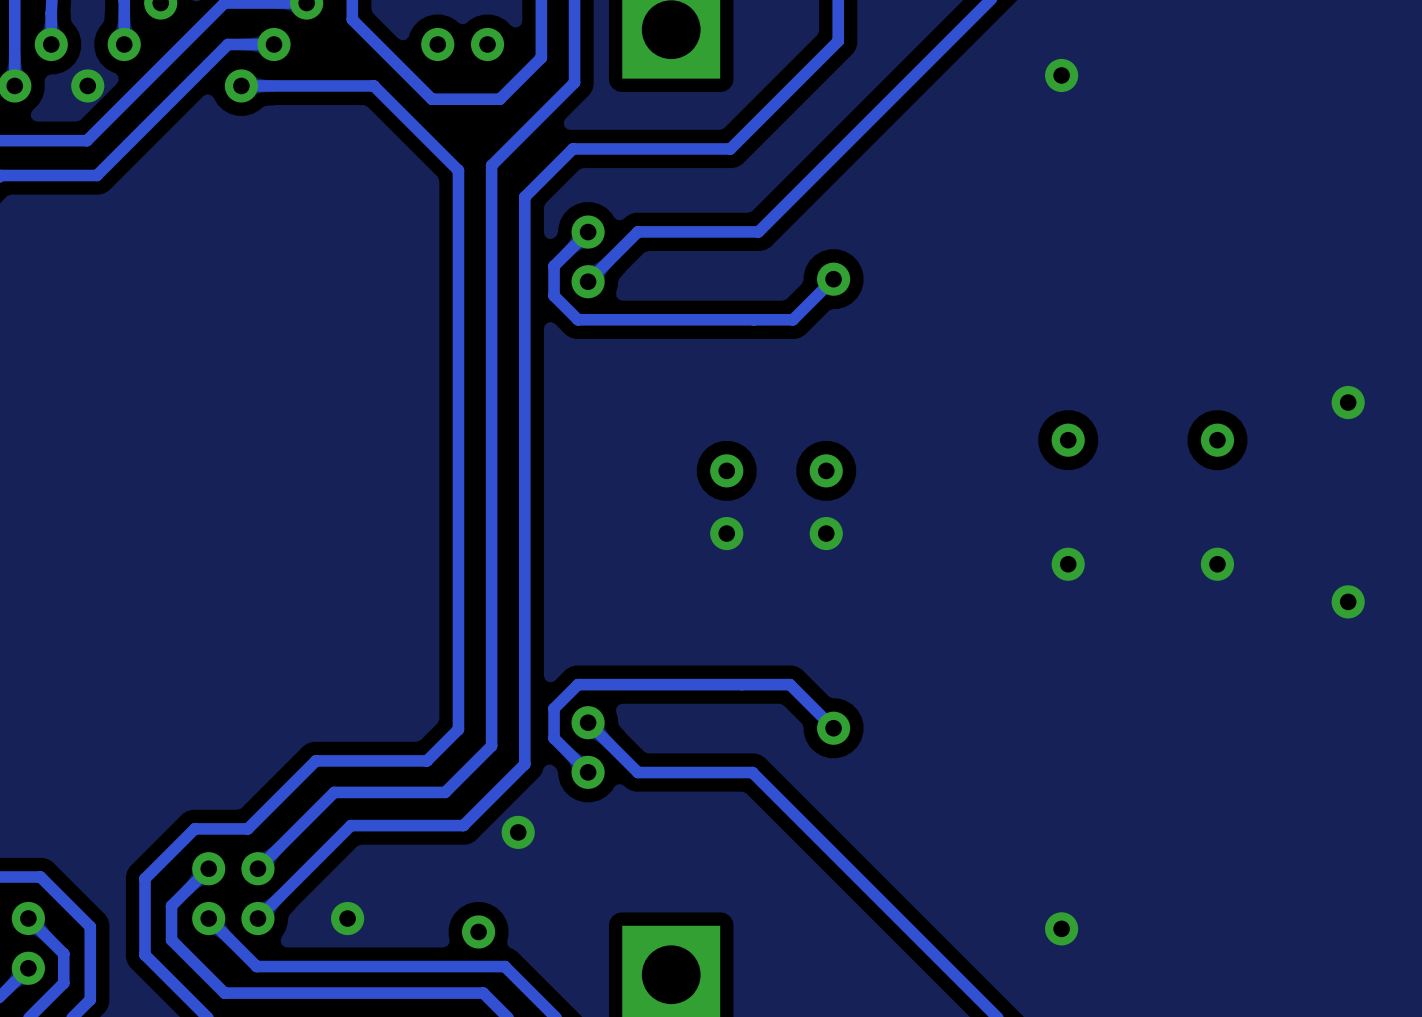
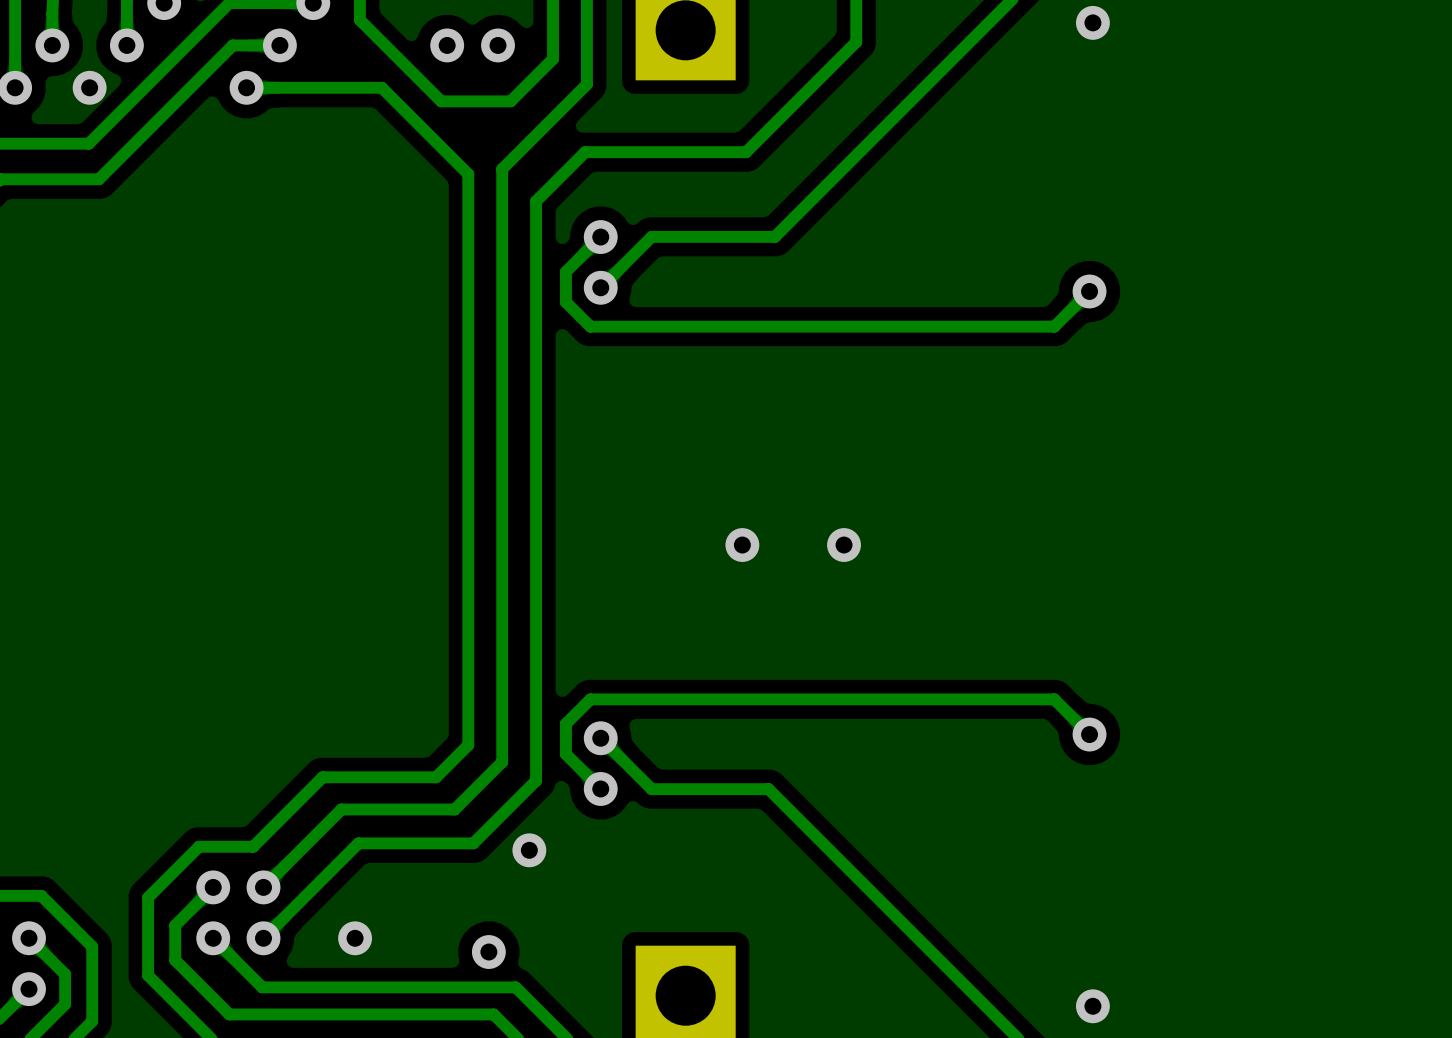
via: none -> (1092, 22)
via: (1061, 75) -> none
track: (833, 279) (792, 319) -> (1089, 291) (1054, 326) (810, 326)
via: (833, 279) -> none
via: none -> (1089, 291)
via: (1348, 402) -> none
via: (1068, 440) -> none
via: (1217, 440) -> none
via: (726, 470) -> none
via: (826, 470) -> none
via: (1068, 564) -> none
via: (1217, 564) -> none
via: (1348, 601) -> none
track: (789, 684) (833, 728) -> (806, 699) (1054, 699) (1089, 734)
via: none -> (1089, 734)
via: (833, 728) -> none
via: (1061, 928) -> none
via: none -> (1092, 1006)

